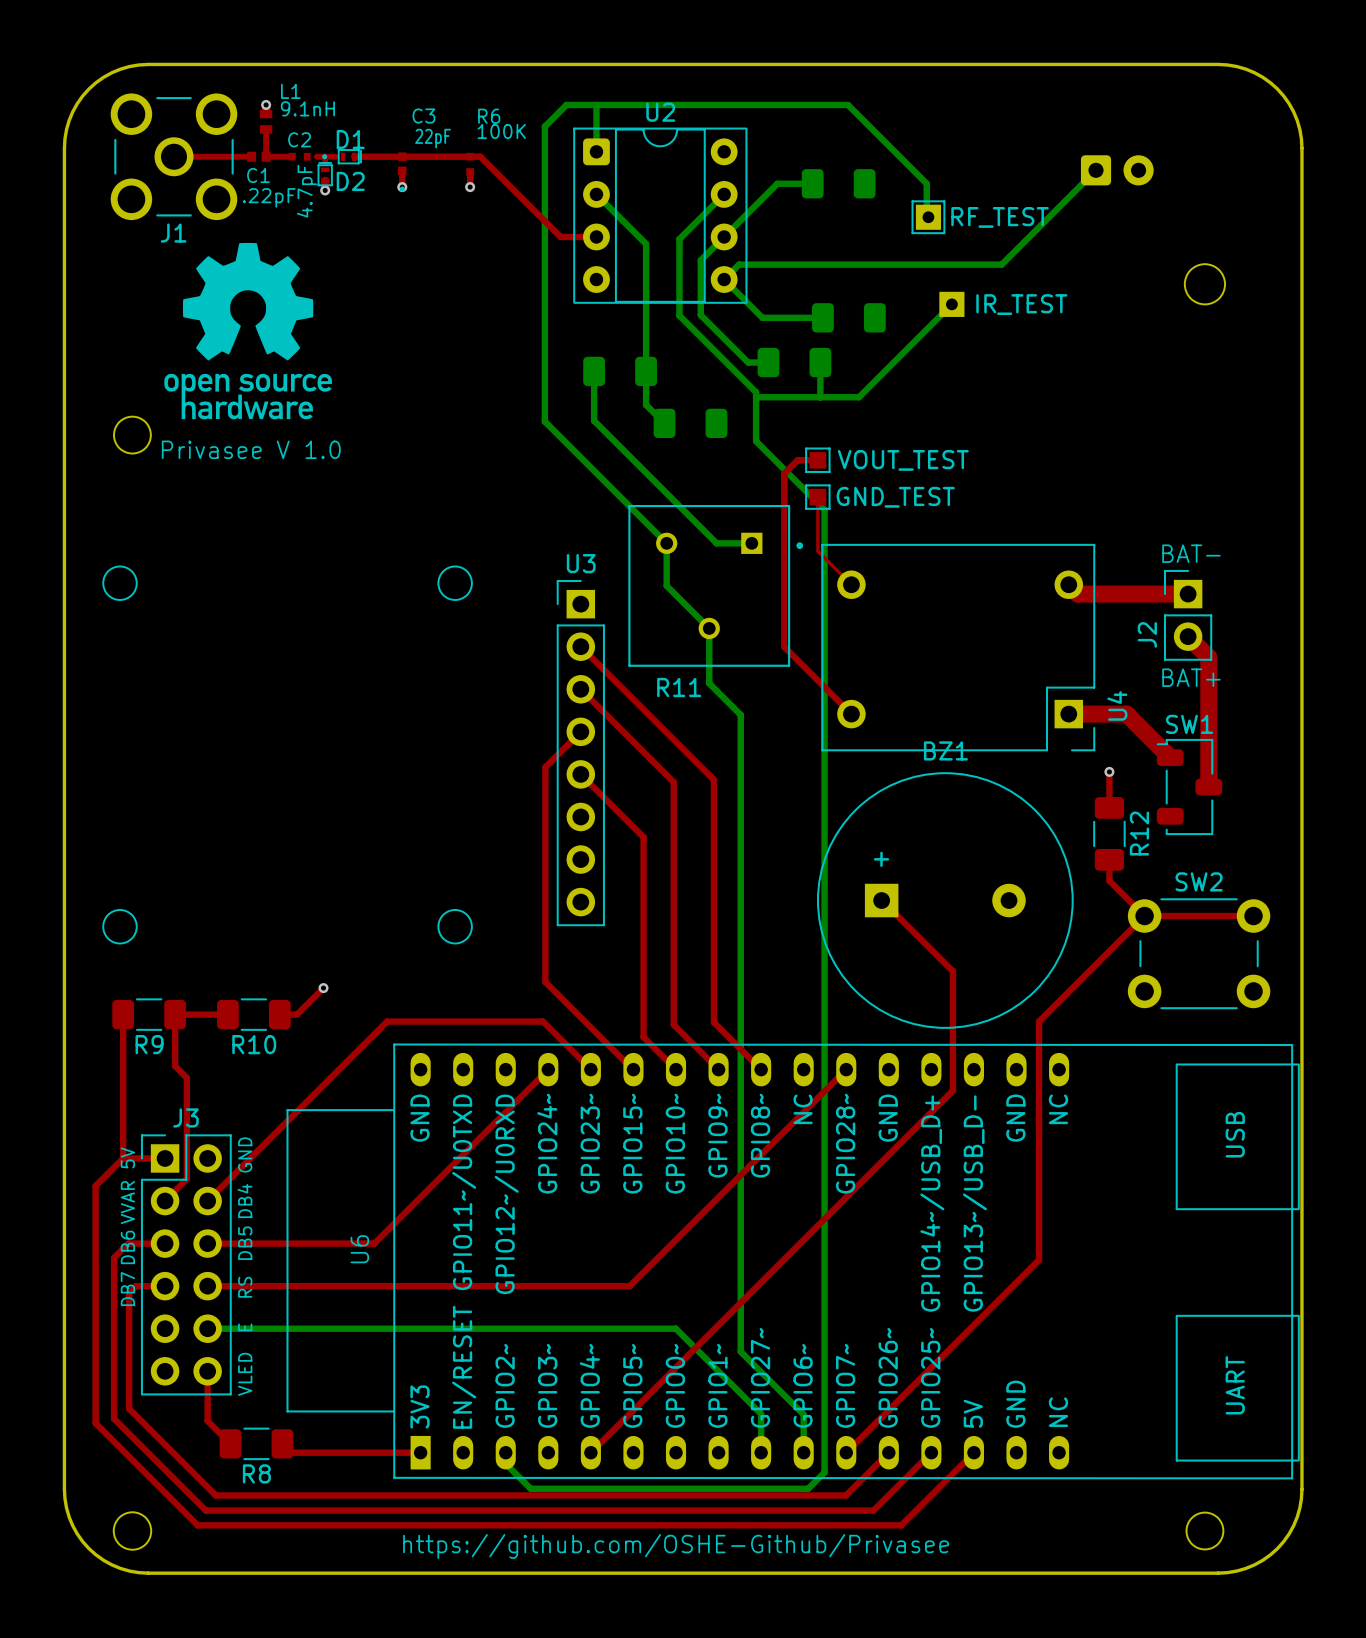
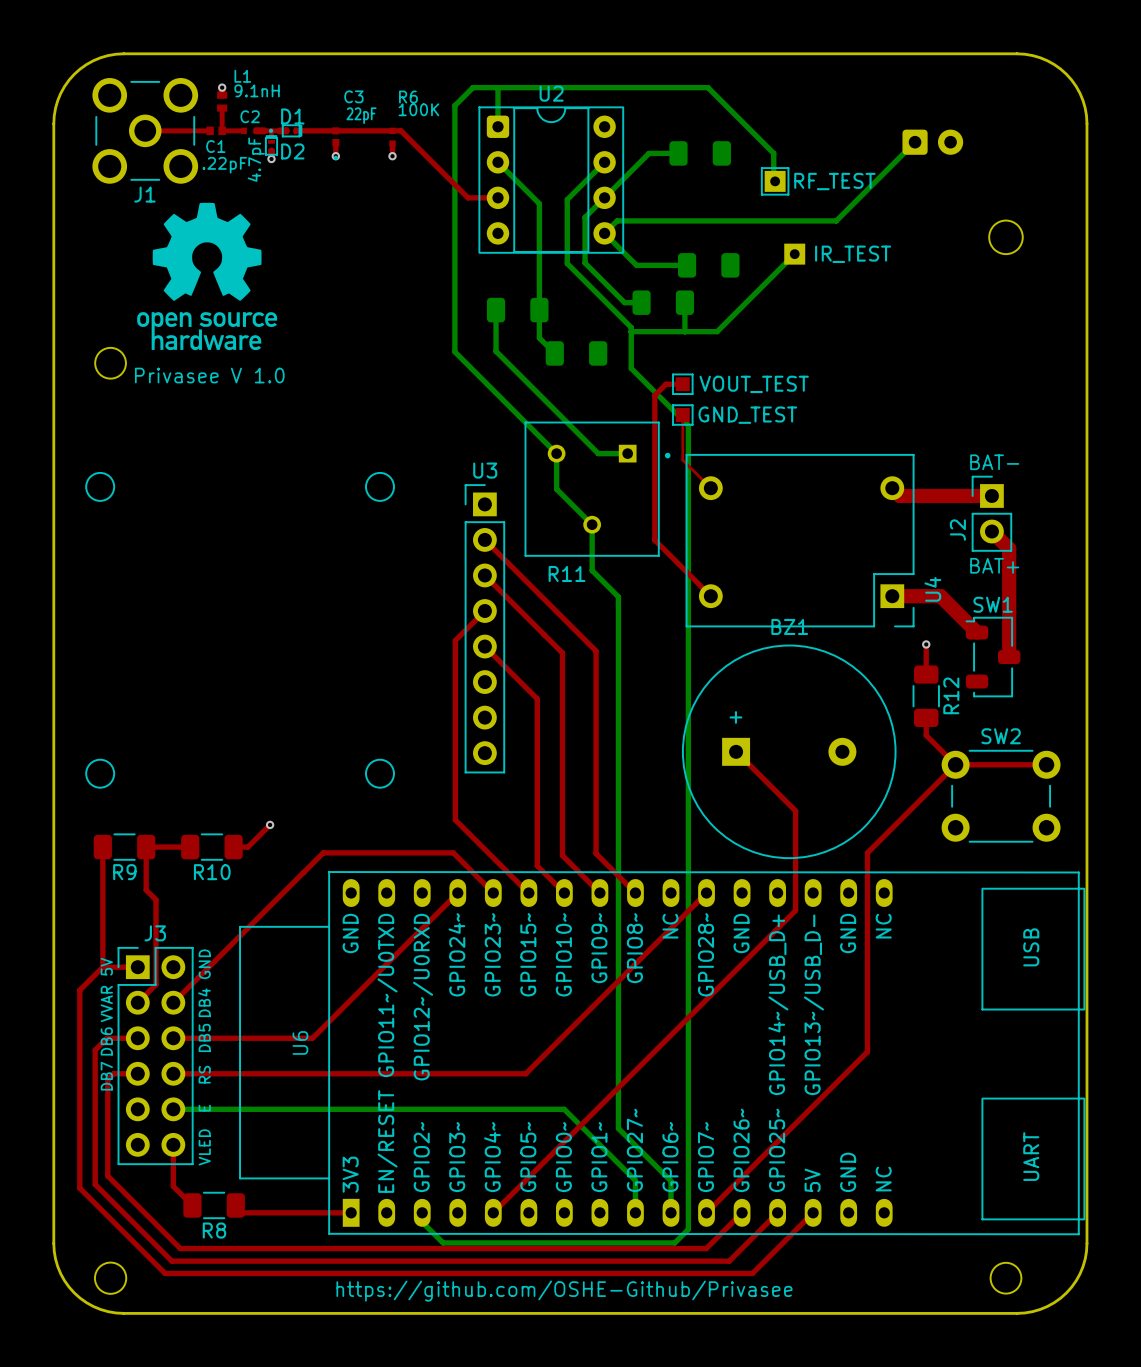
top track: none -> (256, 130) (264, 130)
top track: none -> (279, 130) (286, 130)

